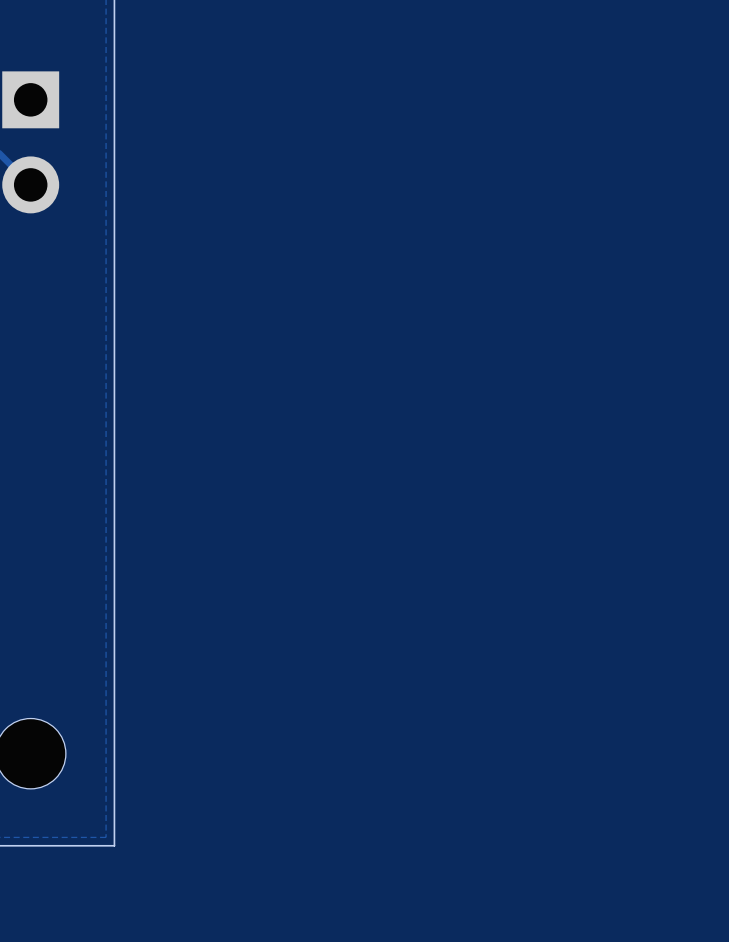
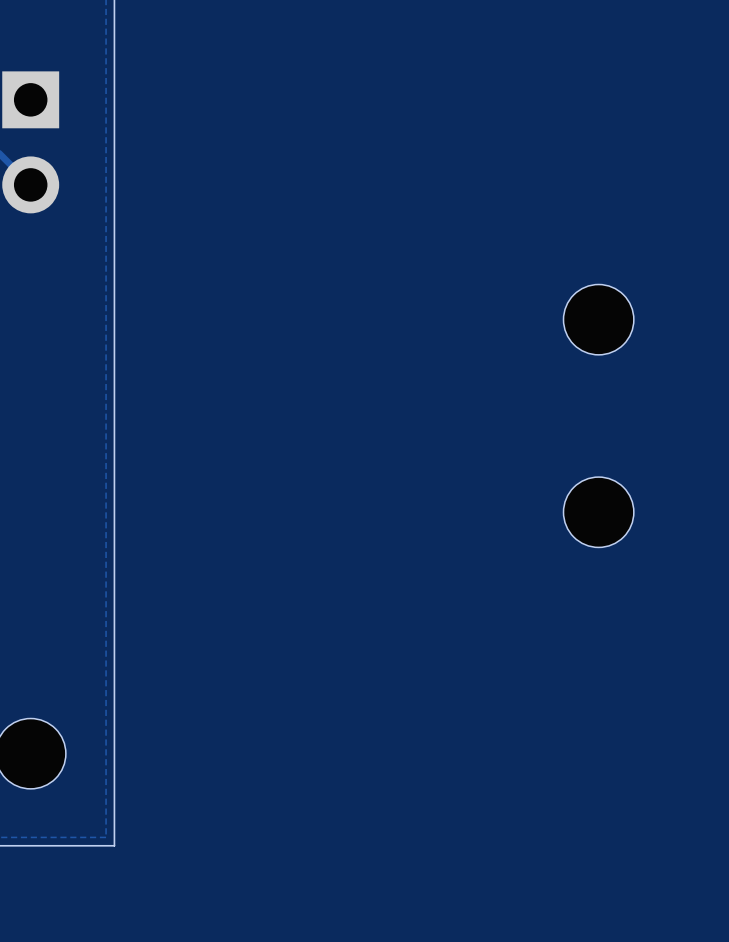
part: none -> (598, 319)
part: none -> (598, 512)

